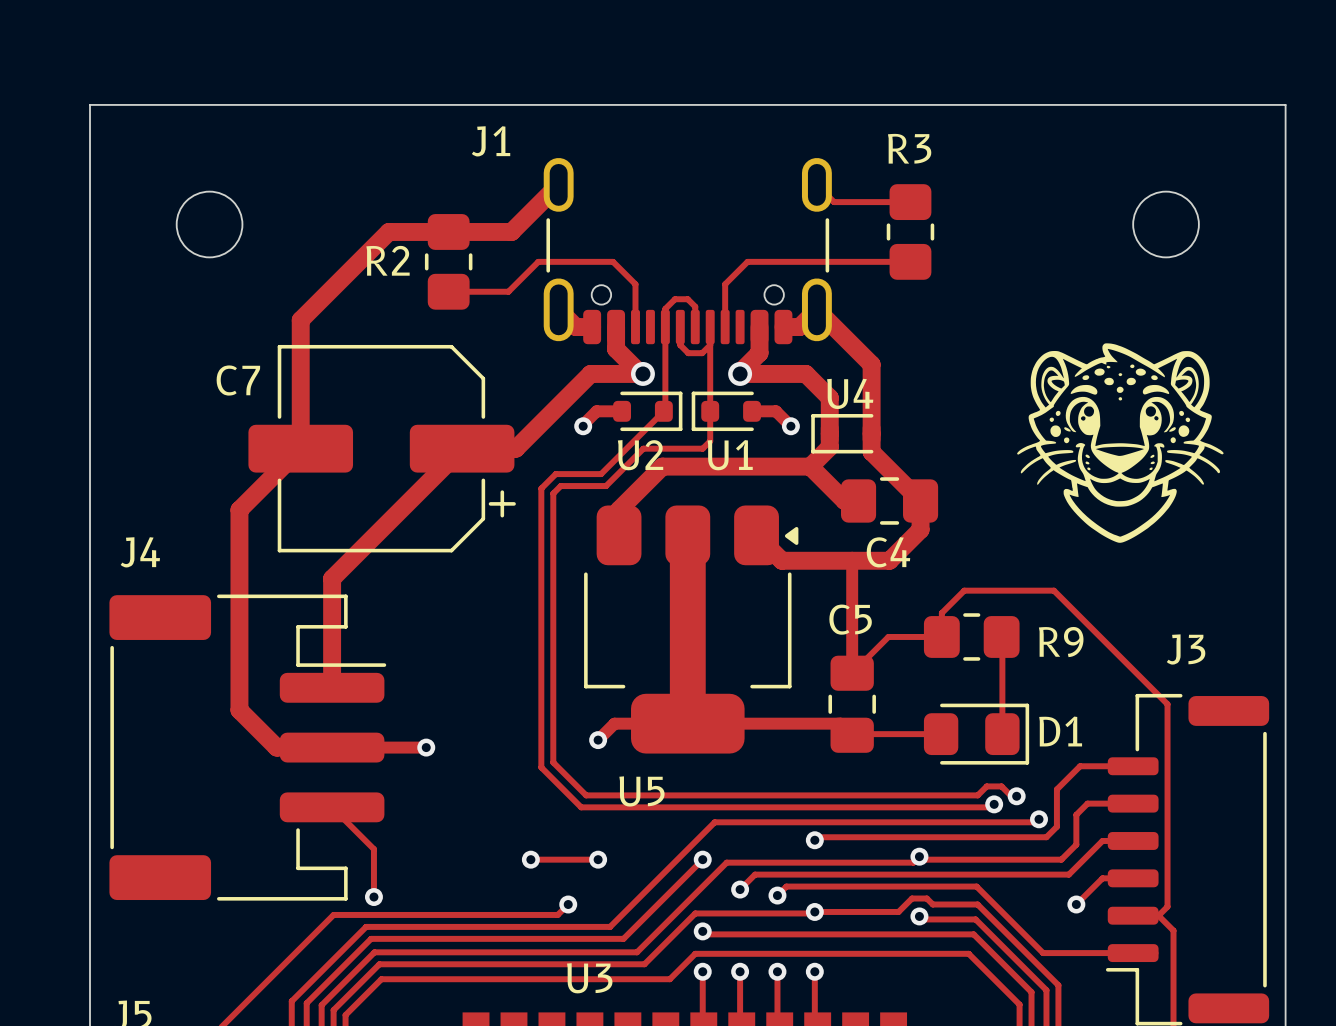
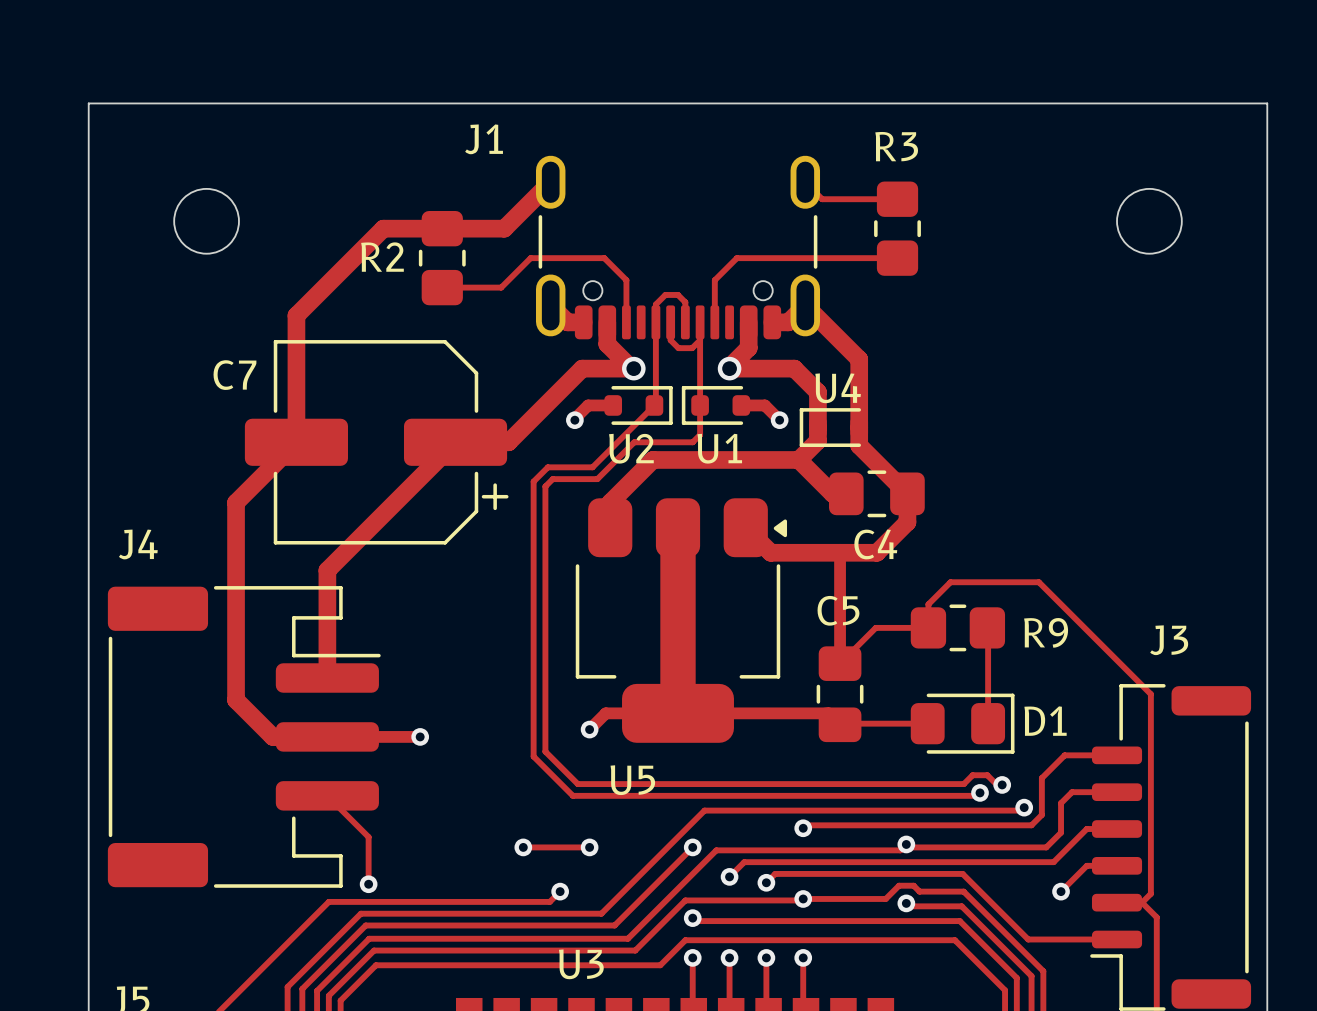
drawing: [1017, 343, 1224, 543] -> none

